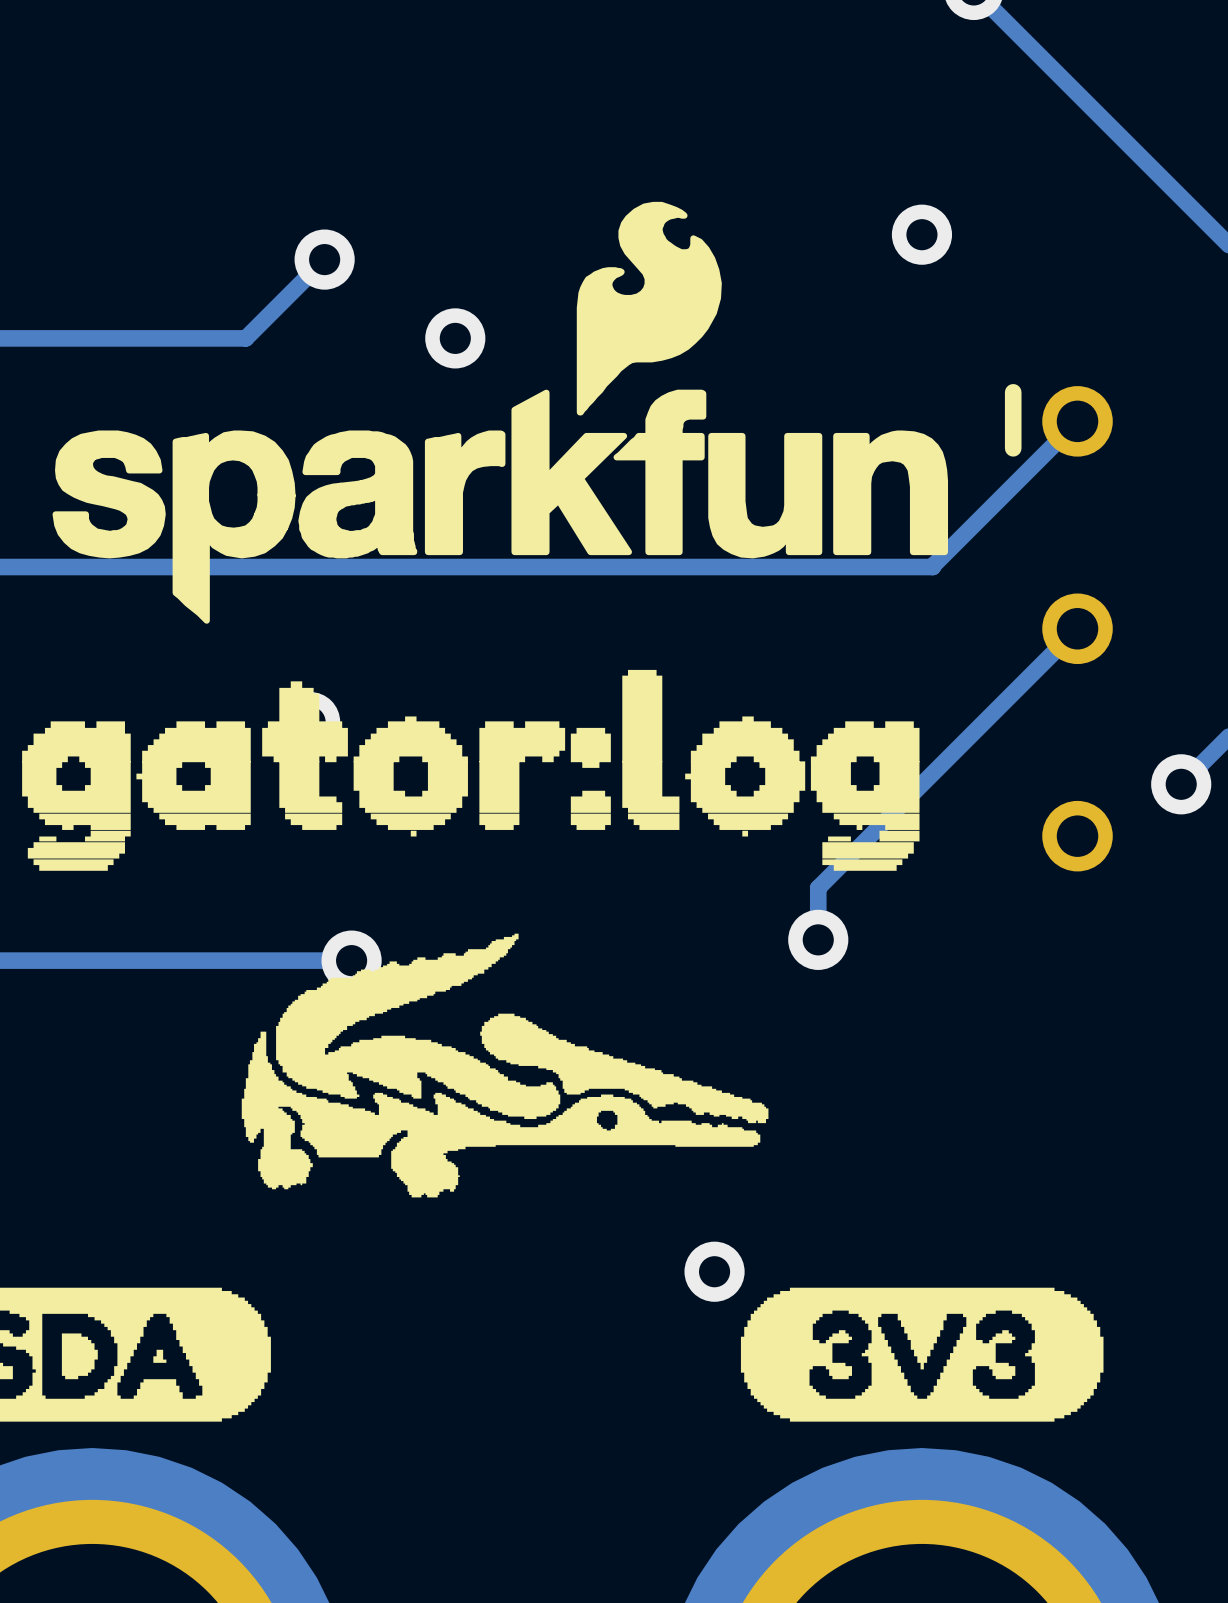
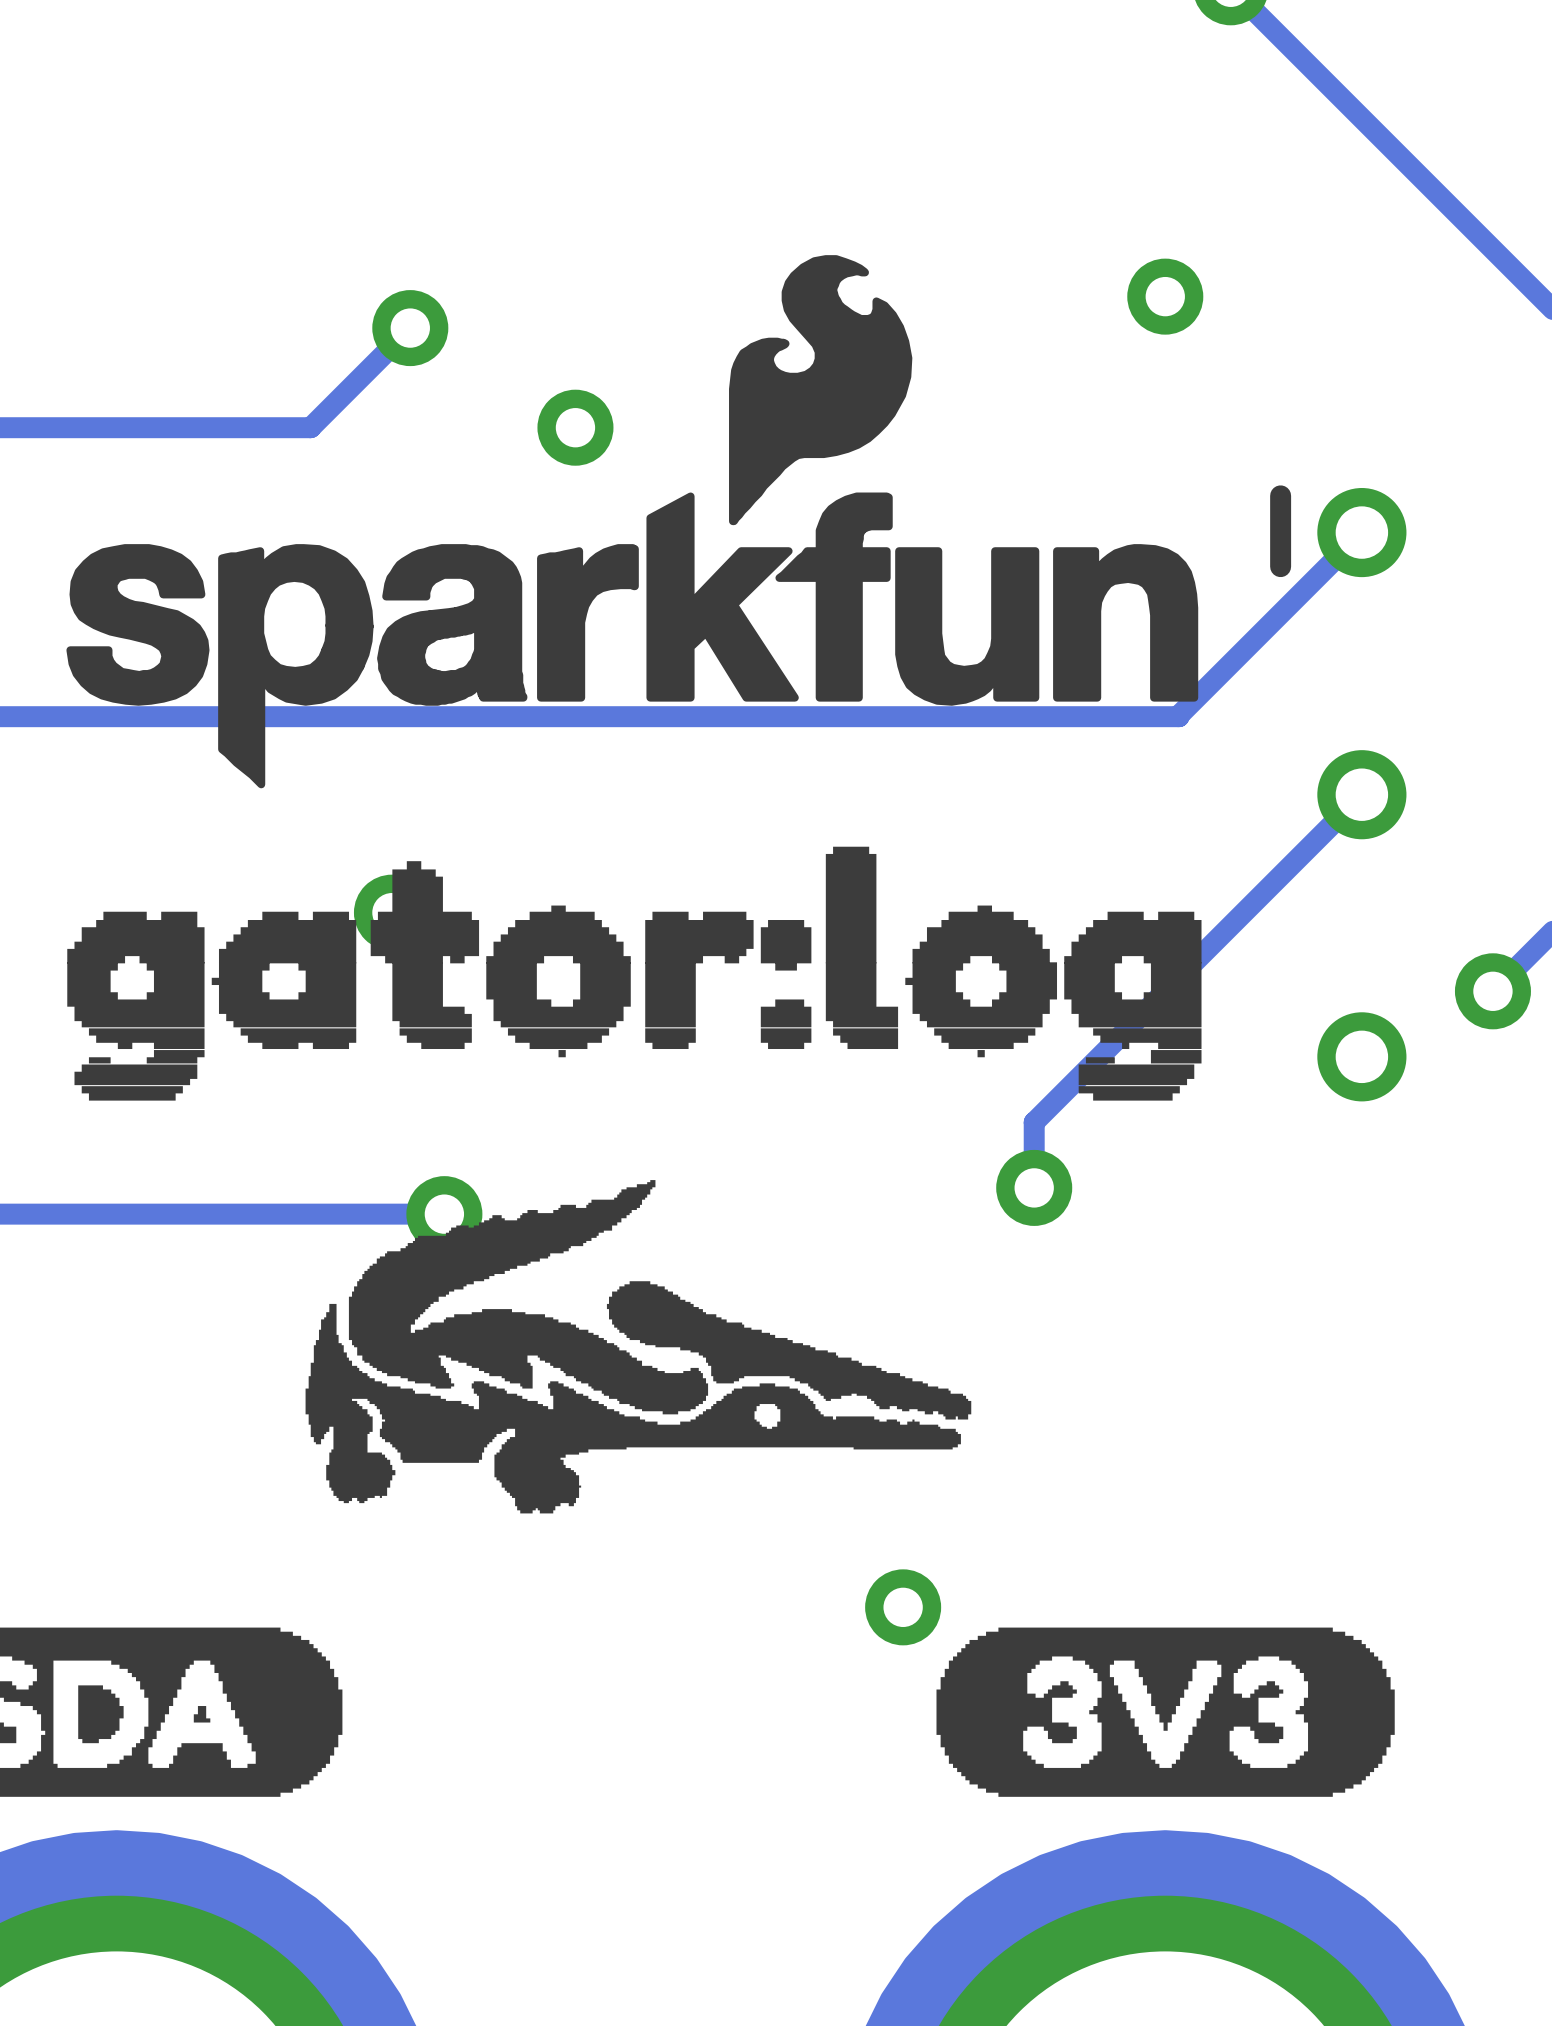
drawing position: (470, 770) -> (634, 973)

